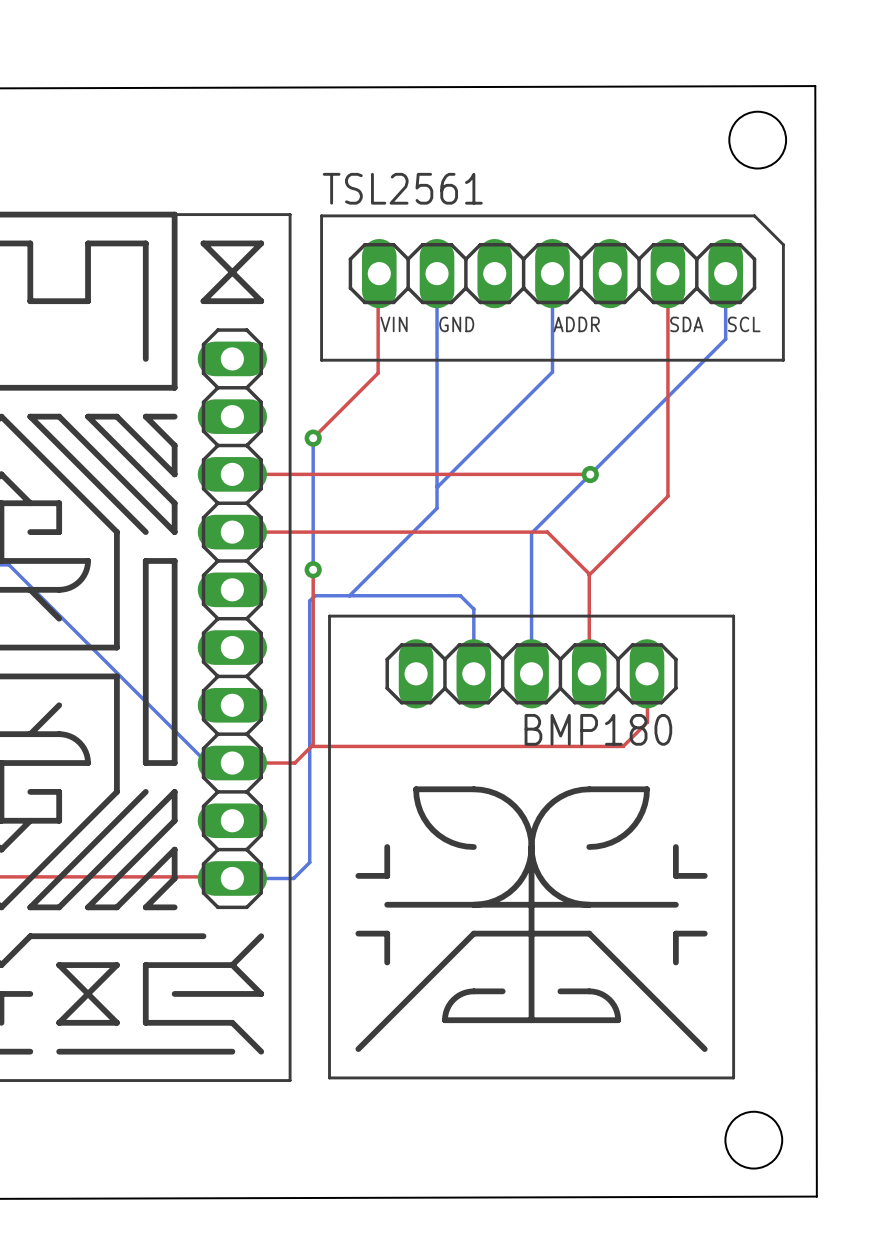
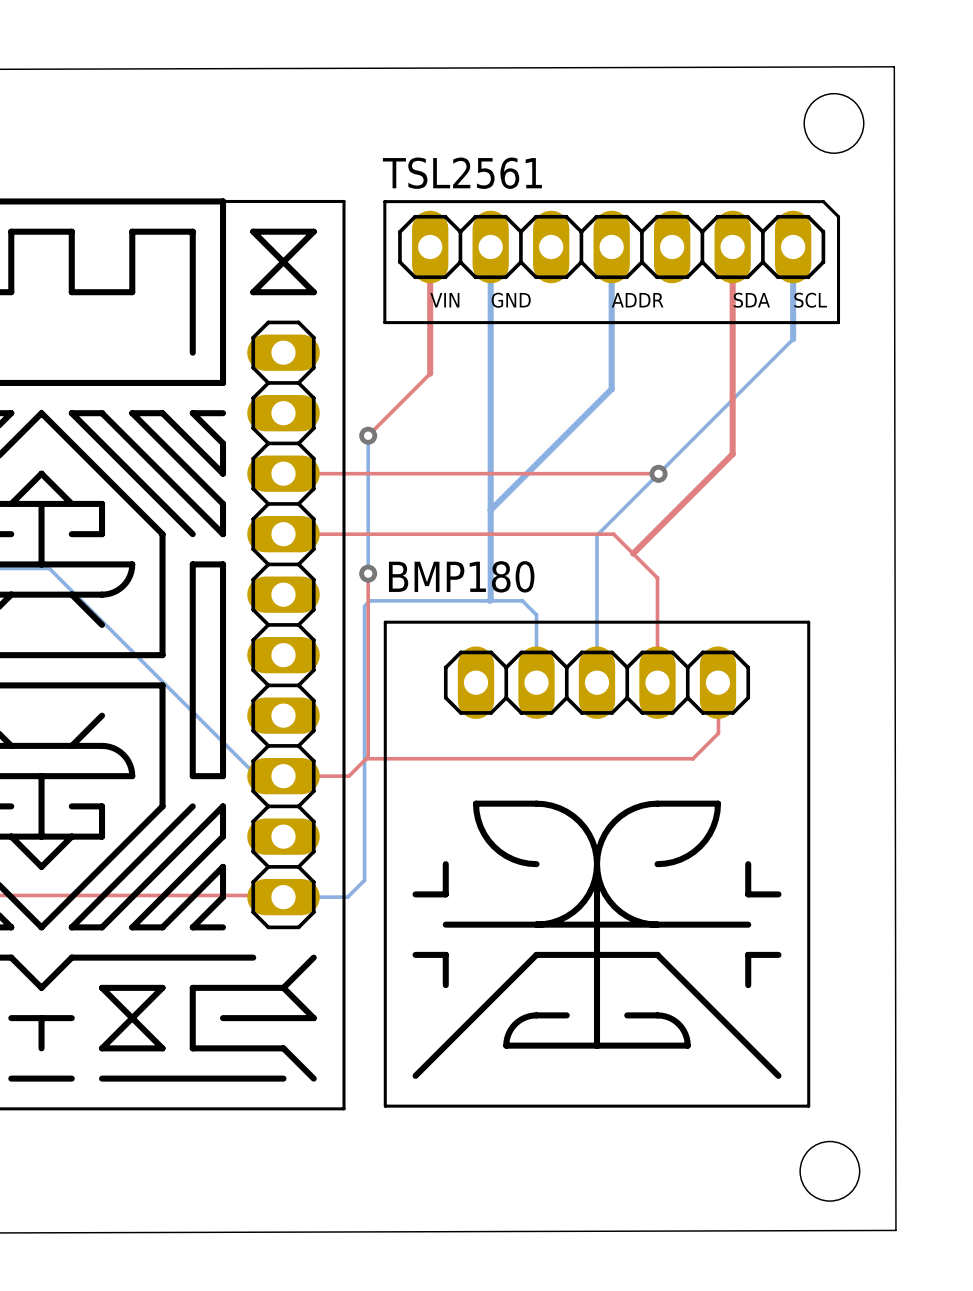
TSL2561 footprint: [320, 214, 785, 362] -> [383, 200, 841, 325]
bottom track: none -> (490, 246) (489, 600)
bottom track: none -> (611, 246) (611, 389) (490, 510)
top track: none -> (732, 246) (732, 454) (633, 553)
top track: (379, 273) (378, 373) (372, 378) -> (430, 246) (430, 373)
bottom track: (552, 273) (552, 372) (437, 486) -> none
top track: (667, 273) (667, 496) (589, 574) -> none
bottom track: (725, 273) (725, 339) (718, 346) -> (793, 246) (793, 339)
bottom track: (436, 285) (437, 273) (437, 508) (349, 595) -> none
BMP180 name position: BMP180 (598, 729) -> BMP180 (461, 576)

